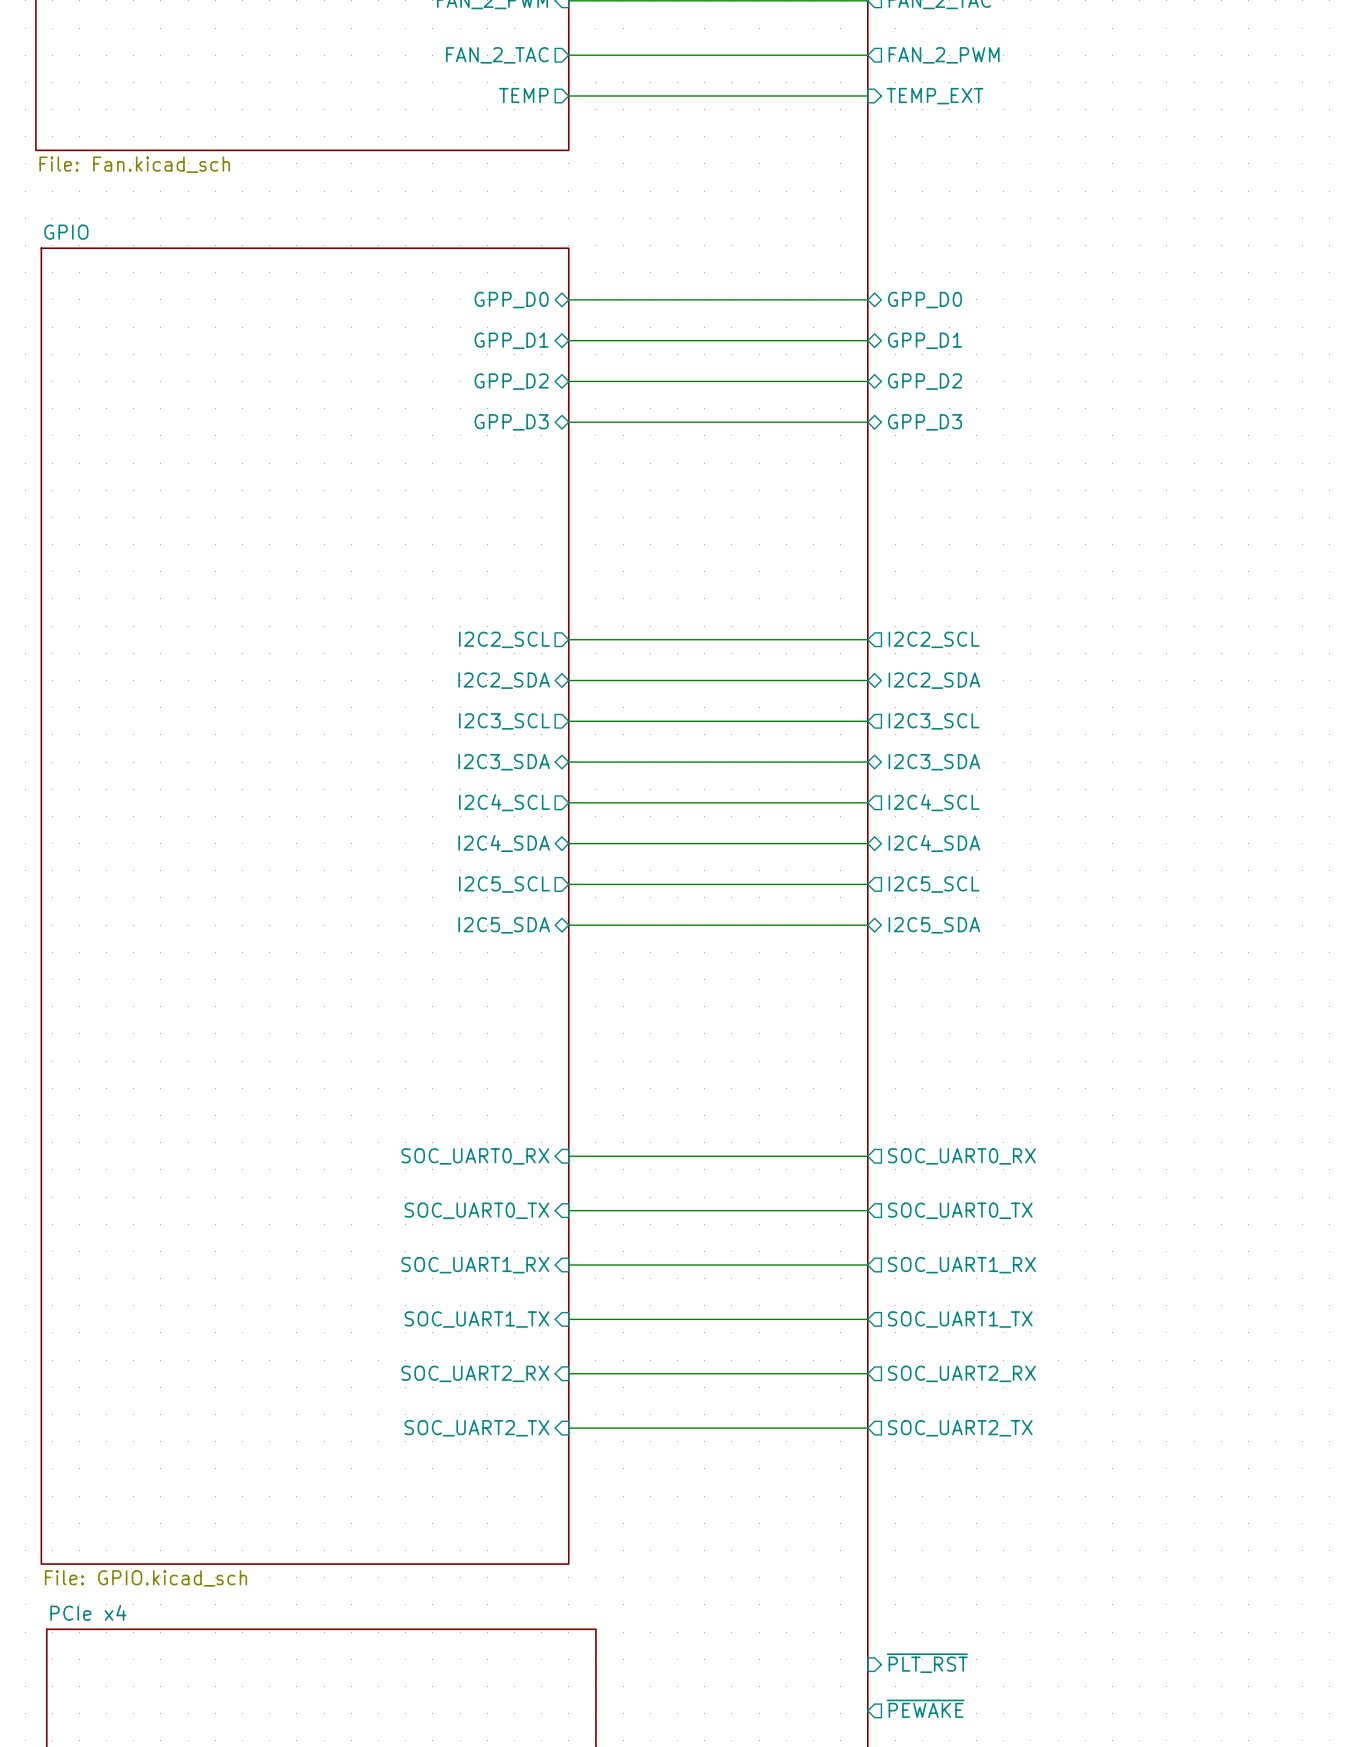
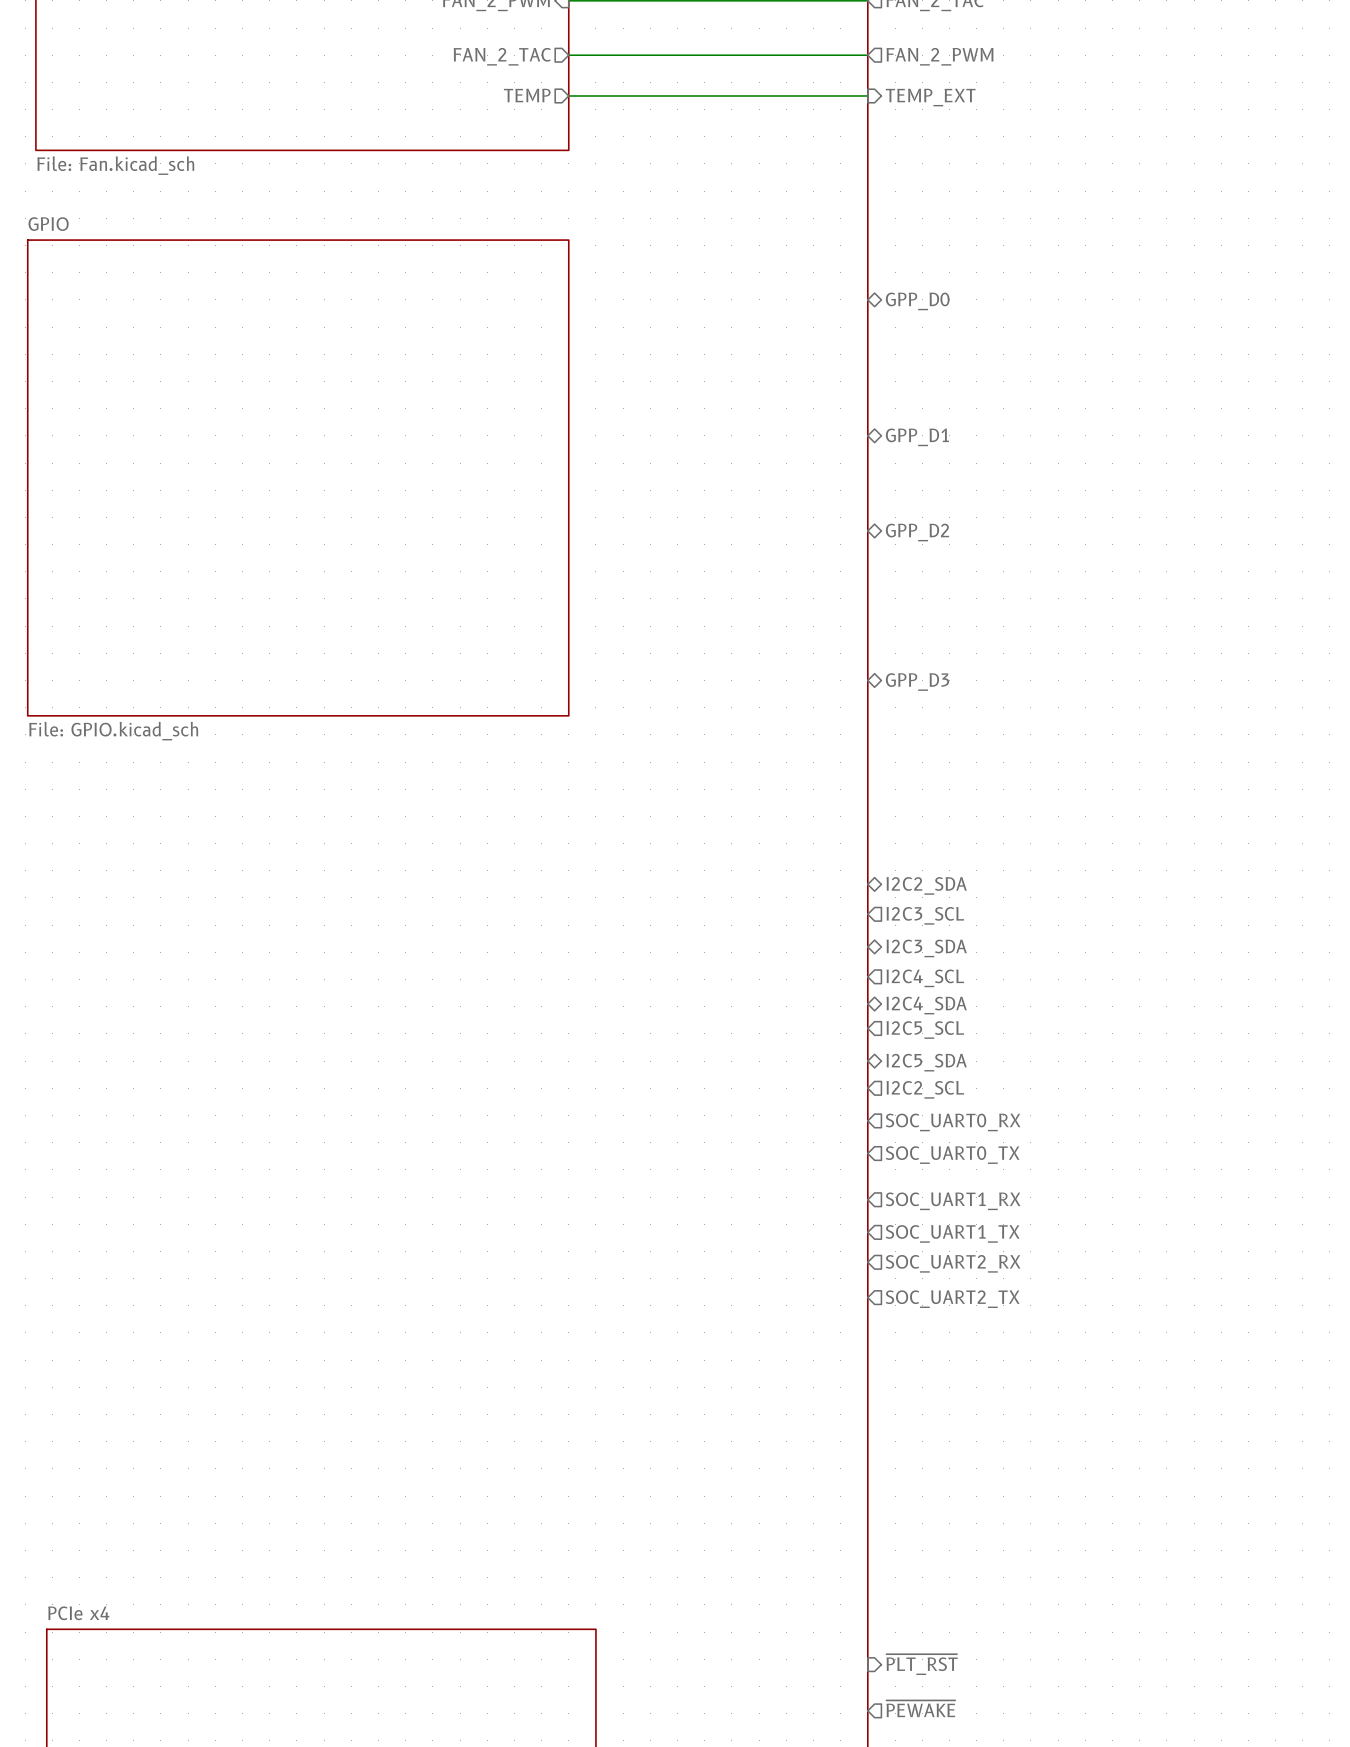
wire: (568, 299) (867, 299) -> none
sheet pin: GPP_D0 (511, 300) -> none
sheet pin: GPP_D1 (511, 340) -> none
wire: (568, 340) (867, 340) -> none
sheet pin position: GPP_D1 (924, 340) -> GPP_D1 (917, 437)
sheet pin: GPP_D2 (511, 381) -> none
wire: (568, 381) (867, 381) -> none
sheet pin position: GPP_D2 (924, 381) -> GPP_D2 (917, 532)
sheet pin: GPP_D3 (511, 422) -> none
wire: (568, 422) (867, 422) -> none
sheet pin: GPP_D3 (924, 422) -> none
sheet GPIO: none -> File: GPIO.kicad_sch (298, 477)
sheet pin: I2C2_SCL (504, 639) -> none
wire: (568, 639) (867, 639) -> none
sheet pin: I2C2_SCL (934, 639) -> none
sheet pin: I2C2_SDA (504, 680) -> none
wire: (568, 680) (867, 680) -> none
sheet pin: I2C2_SDA (934, 680) -> GPP_D3 (917, 682)
sheet pin: I2C3_SCL (504, 721) -> none
wire: (568, 721) (867, 721) -> none
sheet pin: I2C3_SCL (934, 721) -> none
sheet pin: I2C3_SDA (504, 762) -> none
wire: (568, 762) (867, 762) -> none
sheet pin position: I2C3_SDA (934, 762) -> I2C3_SDA (926, 948)
sheet pin: I2C4_SCL (504, 802) -> none
wire: (568, 802) (867, 802) -> none
sheet pin position: I2C4_SCL (934, 802) -> I2C4_SCL (925, 978)
sheet pin: I2C4_SDA (504, 843) -> none
wire: (568, 843) (867, 843) -> none
sheet pin position: I2C4_SDA (934, 843) -> I2C4_SDA (926, 1005)
sheet pin: I2C5_SCL (504, 884) -> none
wire: (568, 884) (867, 884) -> none
sheet pin shape: output (934, 884) -> bidirectional (926, 885)
sheet pin: I2C5_SCL (934, 884) -> I2C2_SDA (926, 885)
sheet GPIO: File: GPIO.kicad_sch (305, 906) -> none
sheet pin: none -> I2C3_SCL (925, 915)
sheet pin: I2C5_SDA (504, 925) -> none
wire: (568, 925) (867, 925) -> none
sheet pin position: I2C5_SDA (934, 925) -> I2C5_SDA (926, 1062)
sheet pin: none -> I2C5_SCL (925, 1030)
sheet pin: none -> I2C2_SCL (925, 1089)
sheet pin: SOC_UART0_RX (475, 1156) -> none
wire: (568, 1156) (867, 1156) -> none
sheet pin position: SOC_UART0_RX (961, 1156) -> SOC_UART0_RX (953, 1122)
sheet pin: SOC_UART0_TX (476, 1210) -> none
wire: (568, 1210) (867, 1210) -> none
sheet pin position: SOC_UART0_TX (960, 1210) -> SOC_UART0_TX (952, 1155)
sheet pin: SOC_UART1_RX (475, 1265) -> none
wire: (568, 1265) (867, 1265) -> none
sheet pin position: SOC_UART1_RX (961, 1265) -> SOC_UART1_RX (953, 1201)
sheet pin: SOC_UART1_TX (476, 1319) -> none
wire: (568, 1319) (867, 1319) -> none
sheet pin position: SOC_UART1_TX (960, 1319) -> SOC_UART1_TX (952, 1233)
sheet pin: SOC_UART2_RX (475, 1373) -> none
wire: (568, 1373) (867, 1373) -> none
sheet pin position: SOC_UART2_RX (961, 1373) -> SOC_UART2_RX (953, 1263)
sheet pin: SOC_UART2_TX (476, 1428) -> none
wire: (568, 1428) (867, 1428) -> none
sheet pin position: SOC_UART2_TX (960, 1428) -> SOC_UART2_TX (952, 1299)

